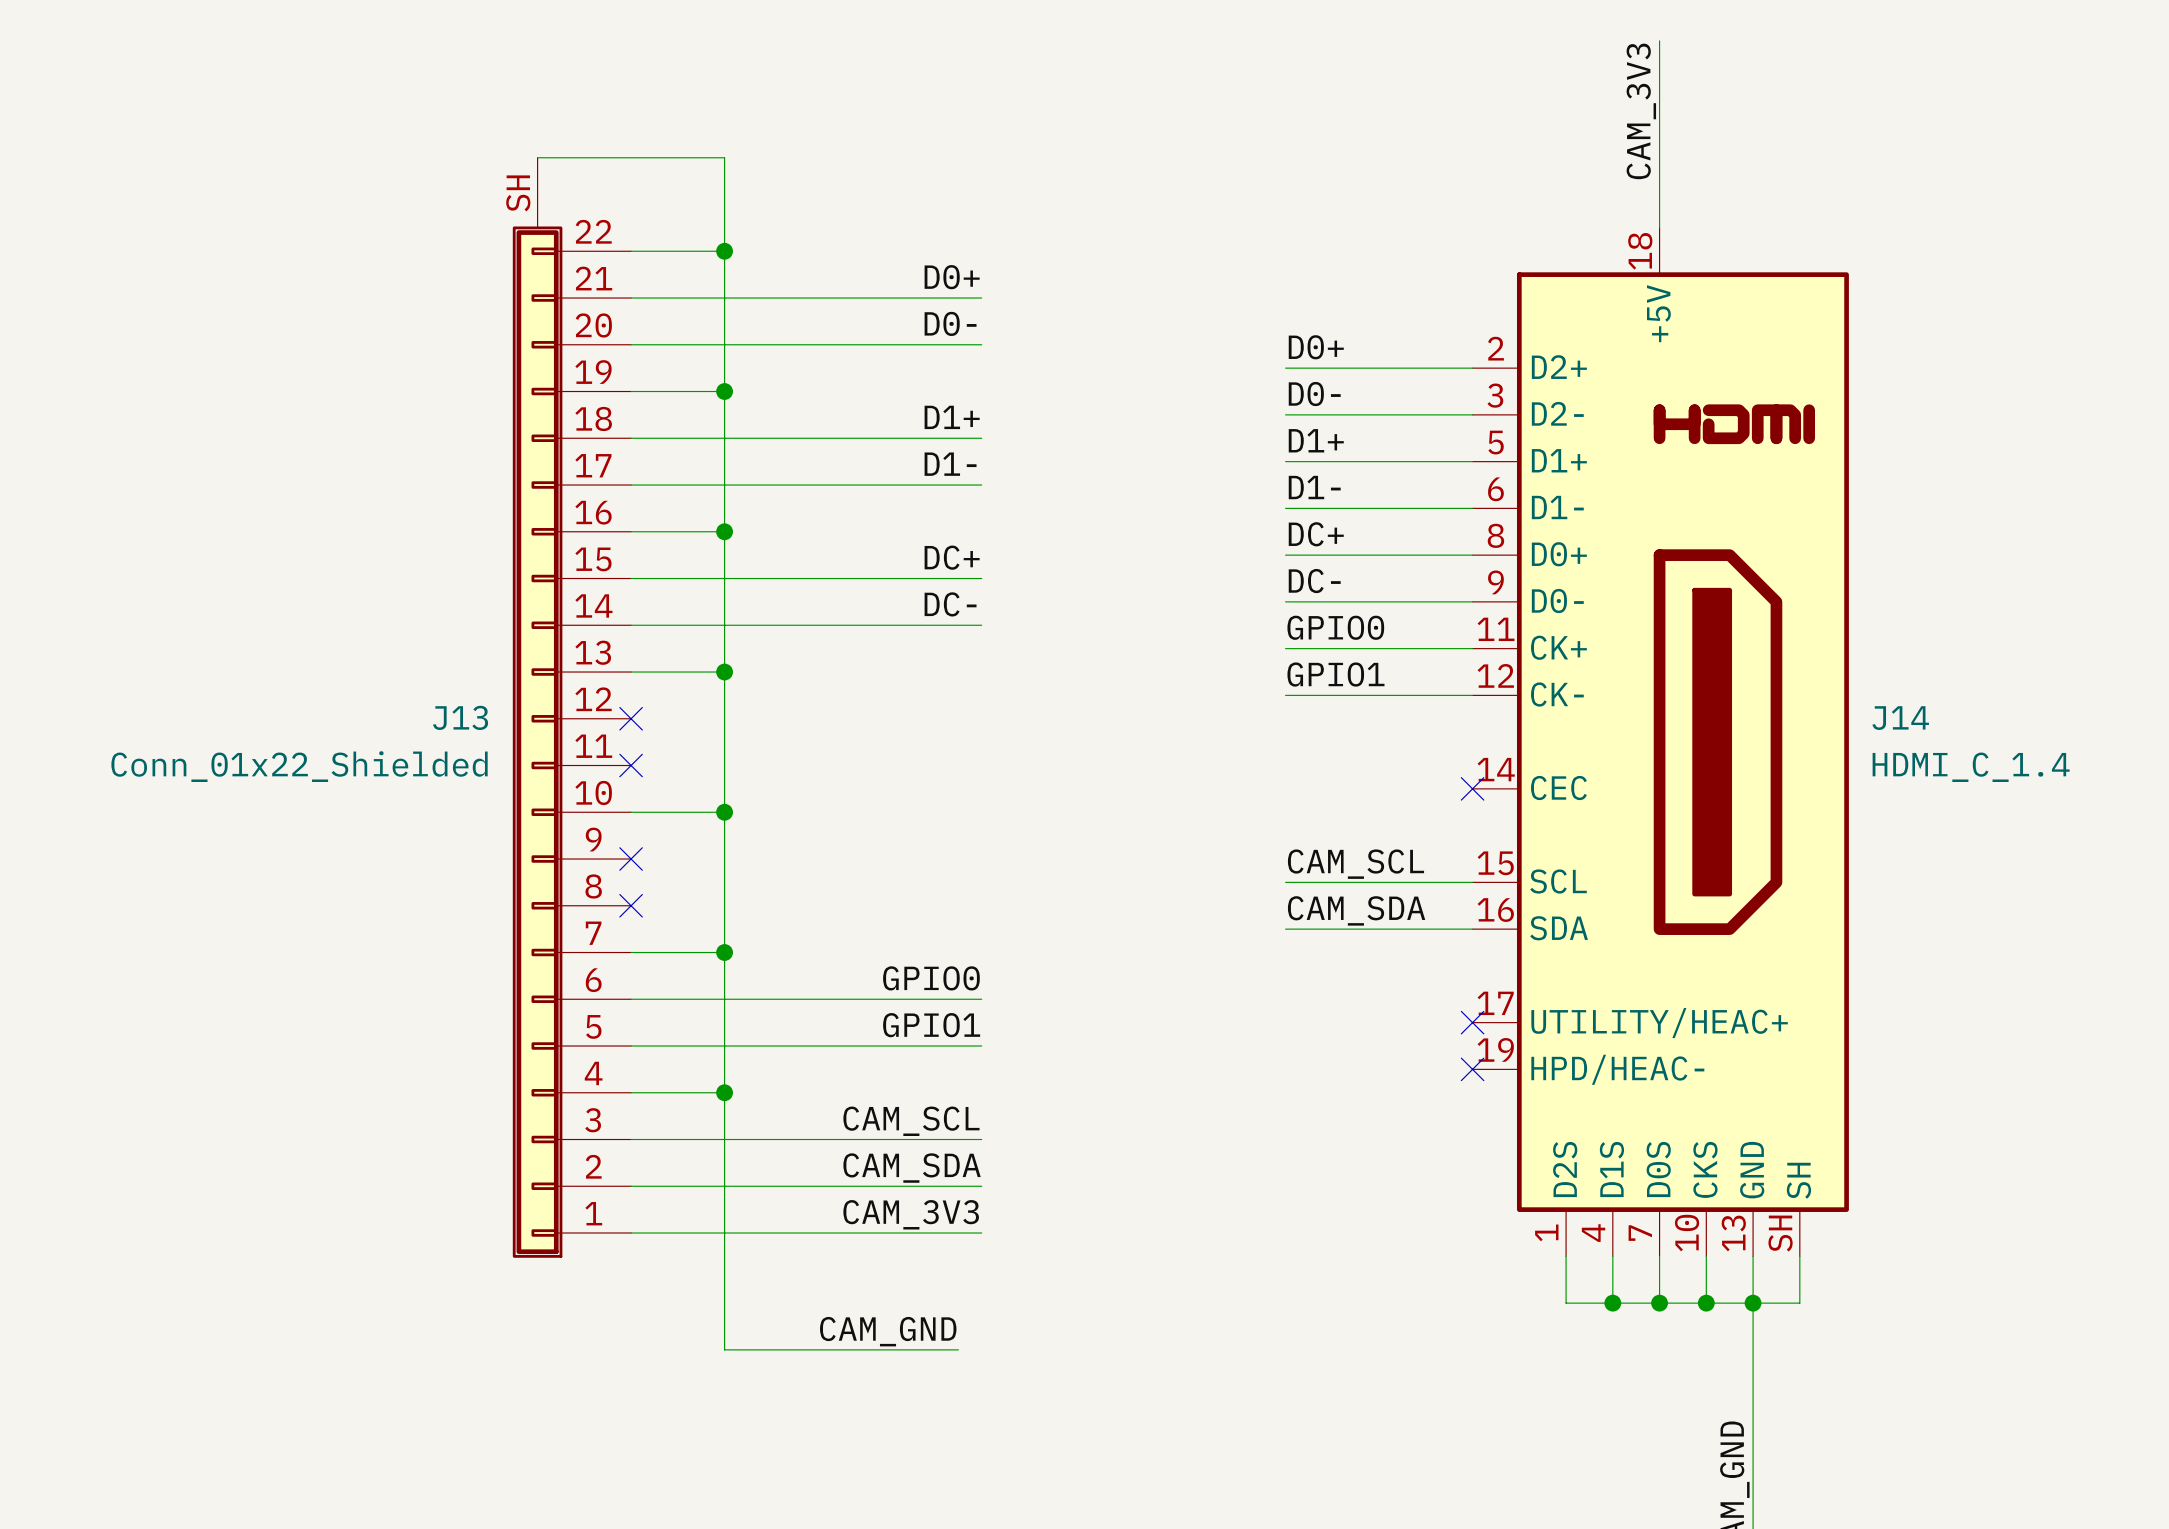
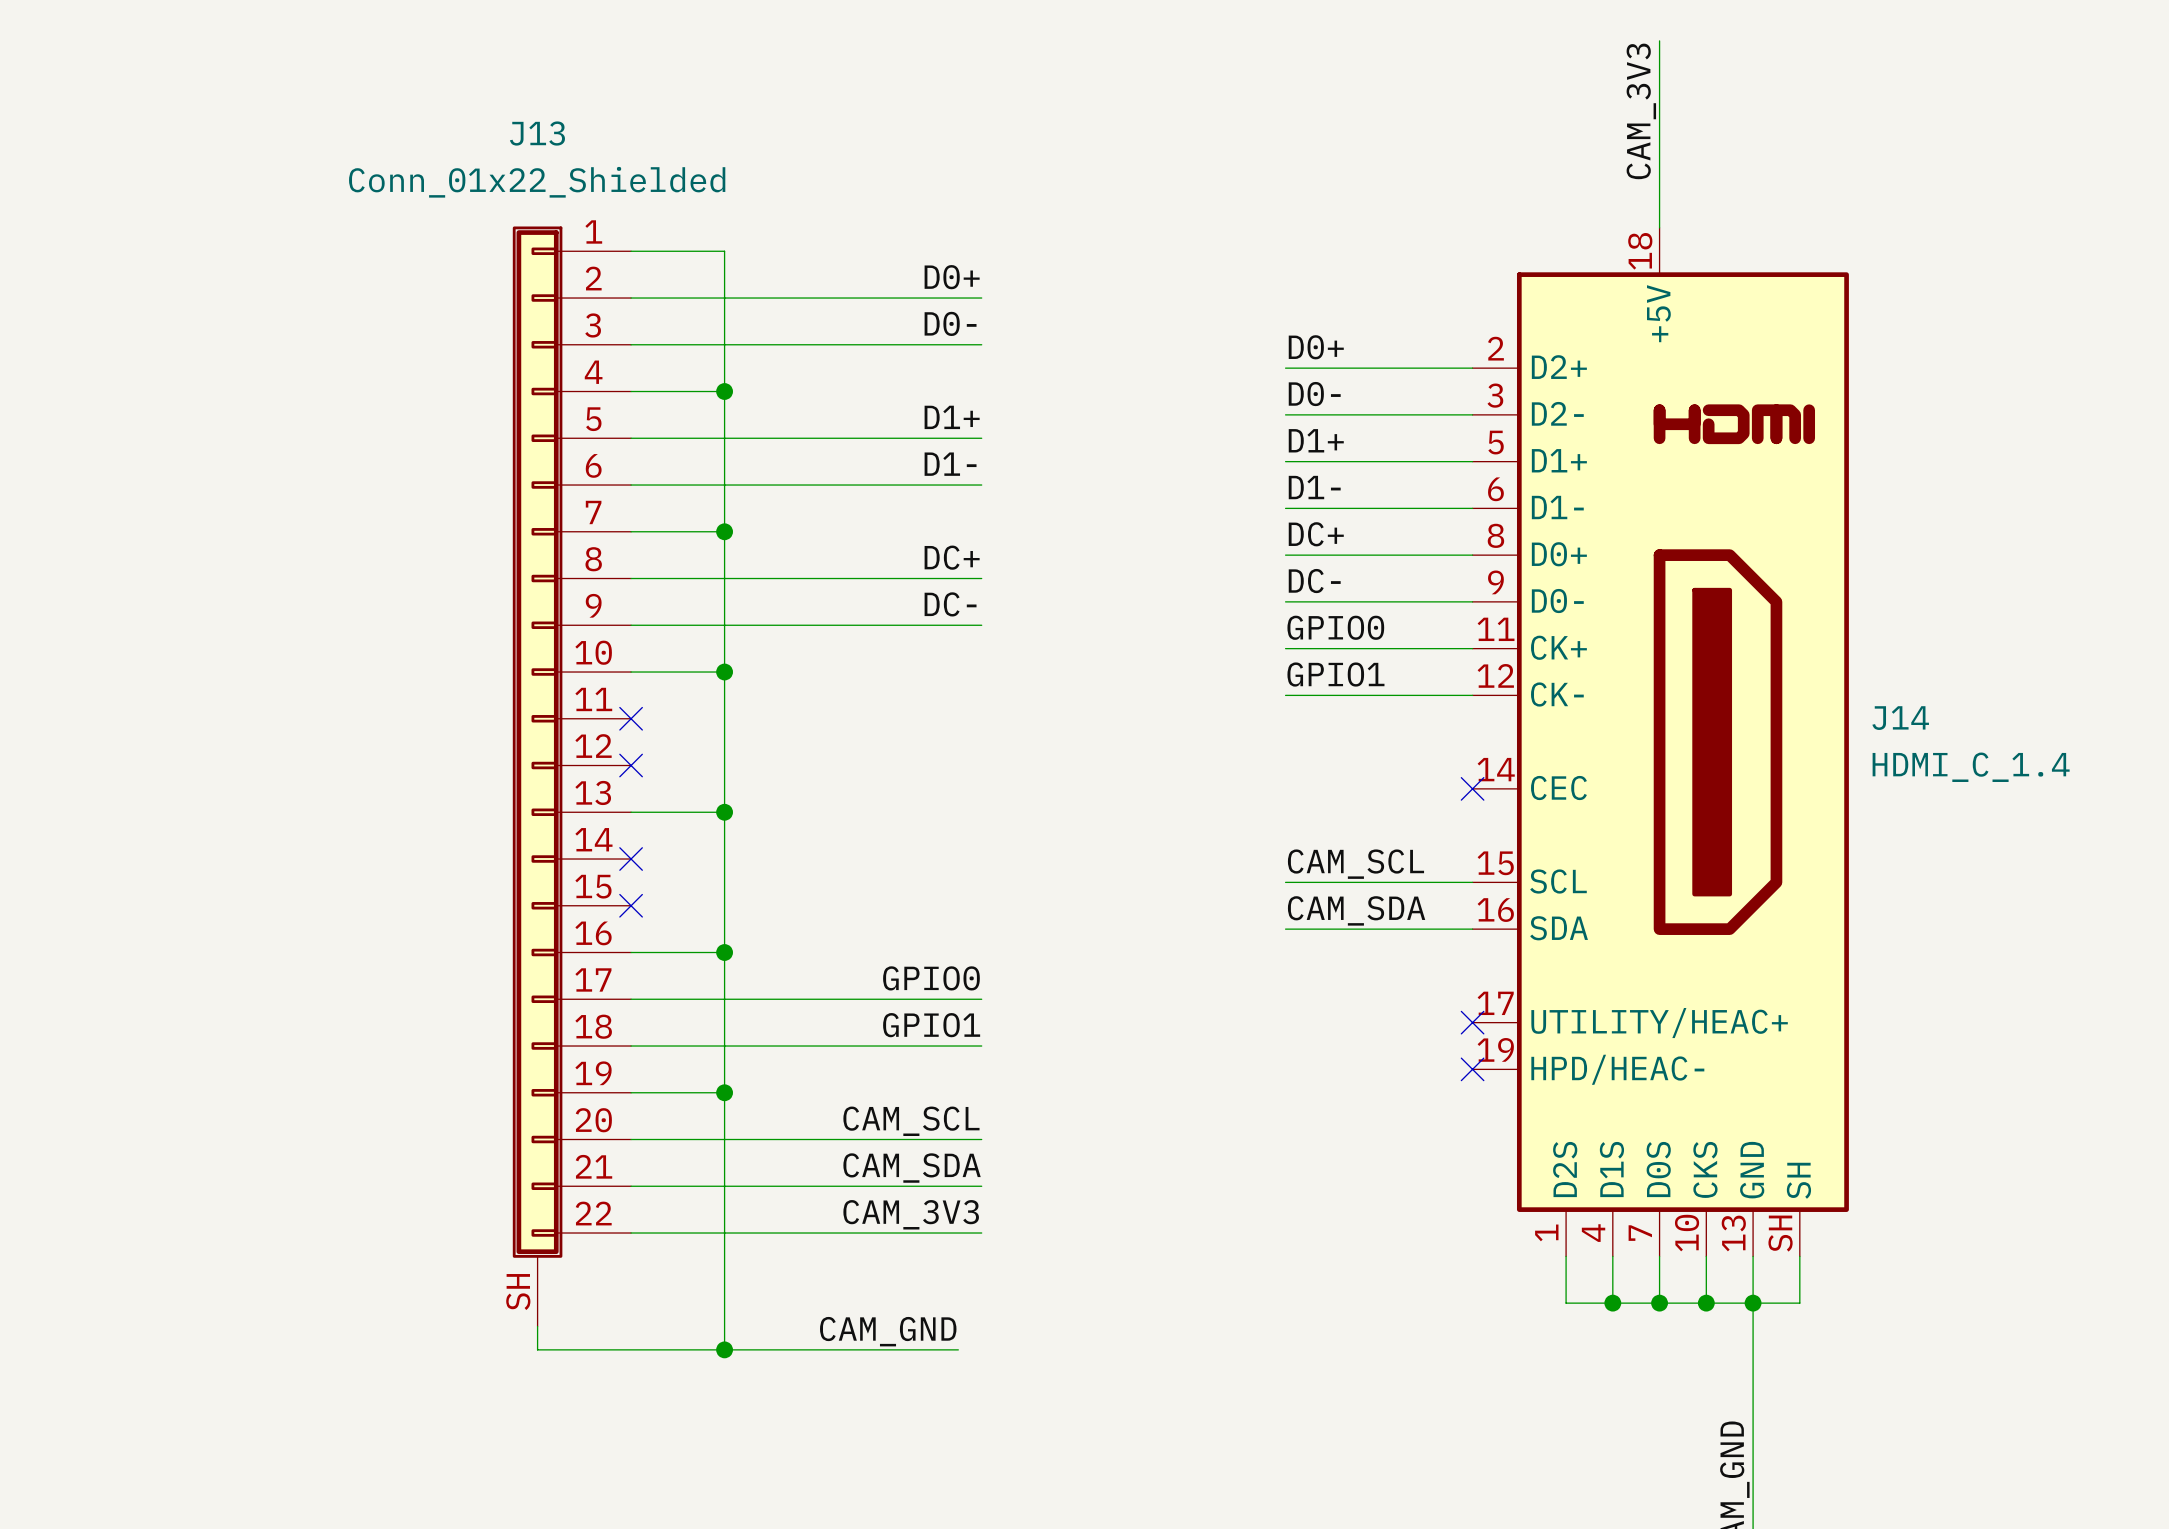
wire: (537, 157) (724, 157) (724, 251) -> none
junction: (724, 251) -> none
J13 name position: J13 (460, 717) -> J13 (537, 133)
J13 flip: as is (537, 742) -> up-down (537, 742)
J13 value position: Conn_01x22_Shielded (299, 766) -> Conn_01x22_Shielded (537, 182)
wire: none -> (537, 1326) (537, 1349) (724, 1349)
junction: none -> (724, 1349)

